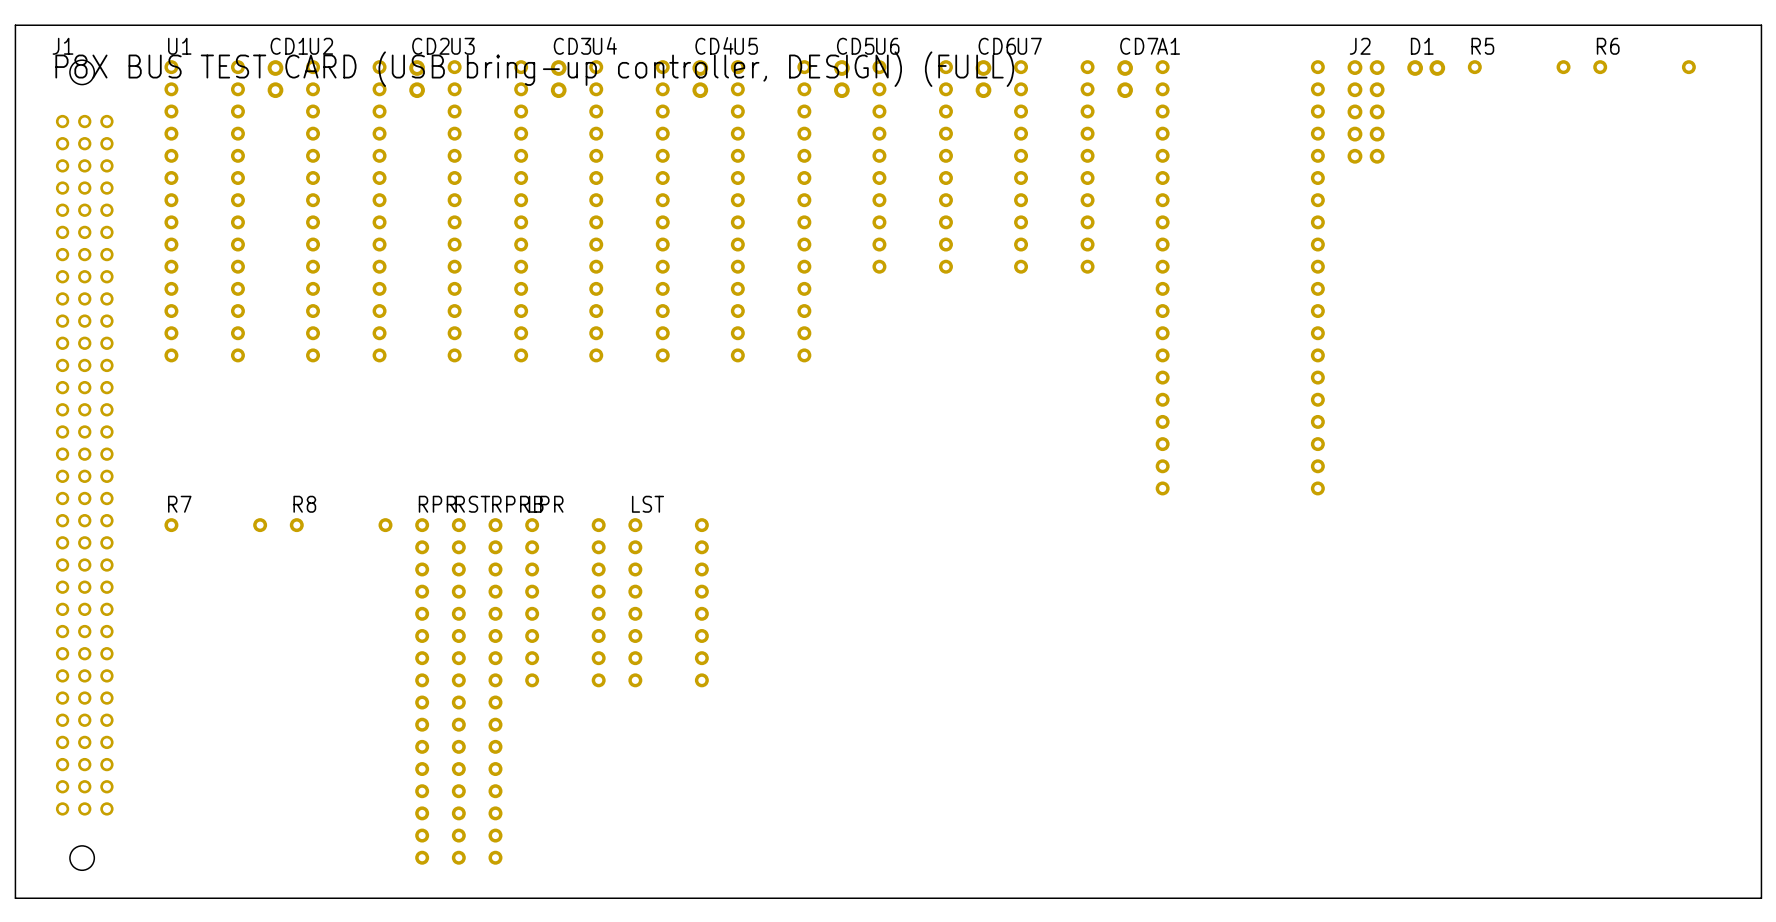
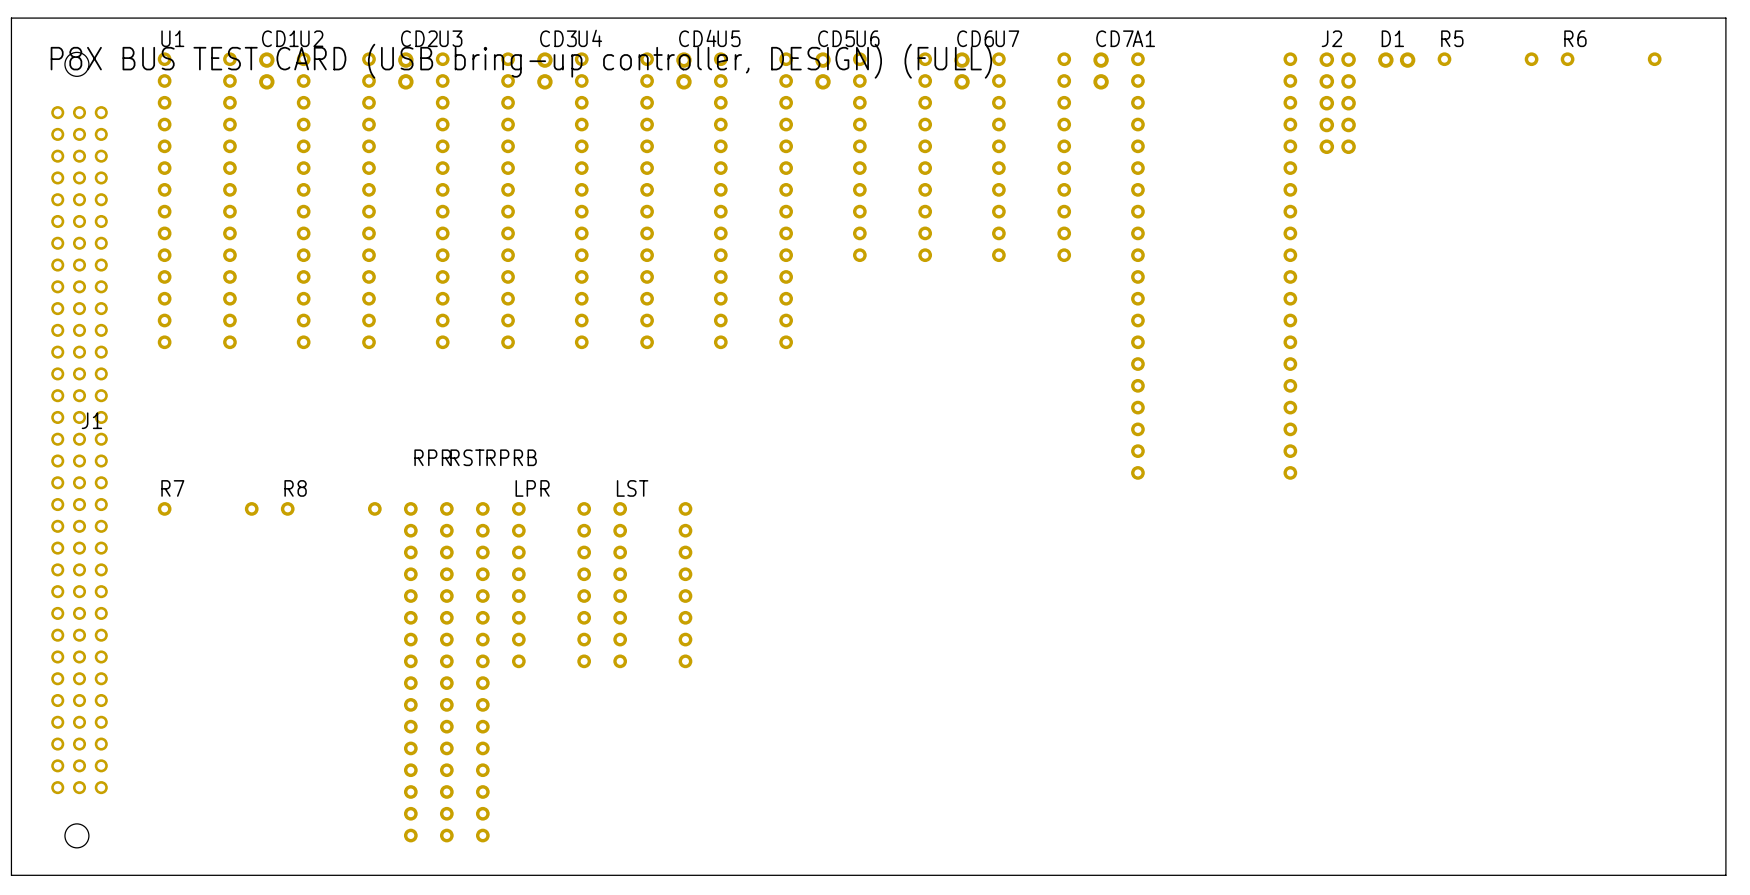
J1 name position: J1 (63, 46) -> J1 (91, 420)
RPR name position: RPR (437, 504) -> RPR (432, 457)
RST name position: RST (472, 504) -> RST (467, 457)
RPRB name position: RPRB (517, 504) -> RPRB (511, 457)

